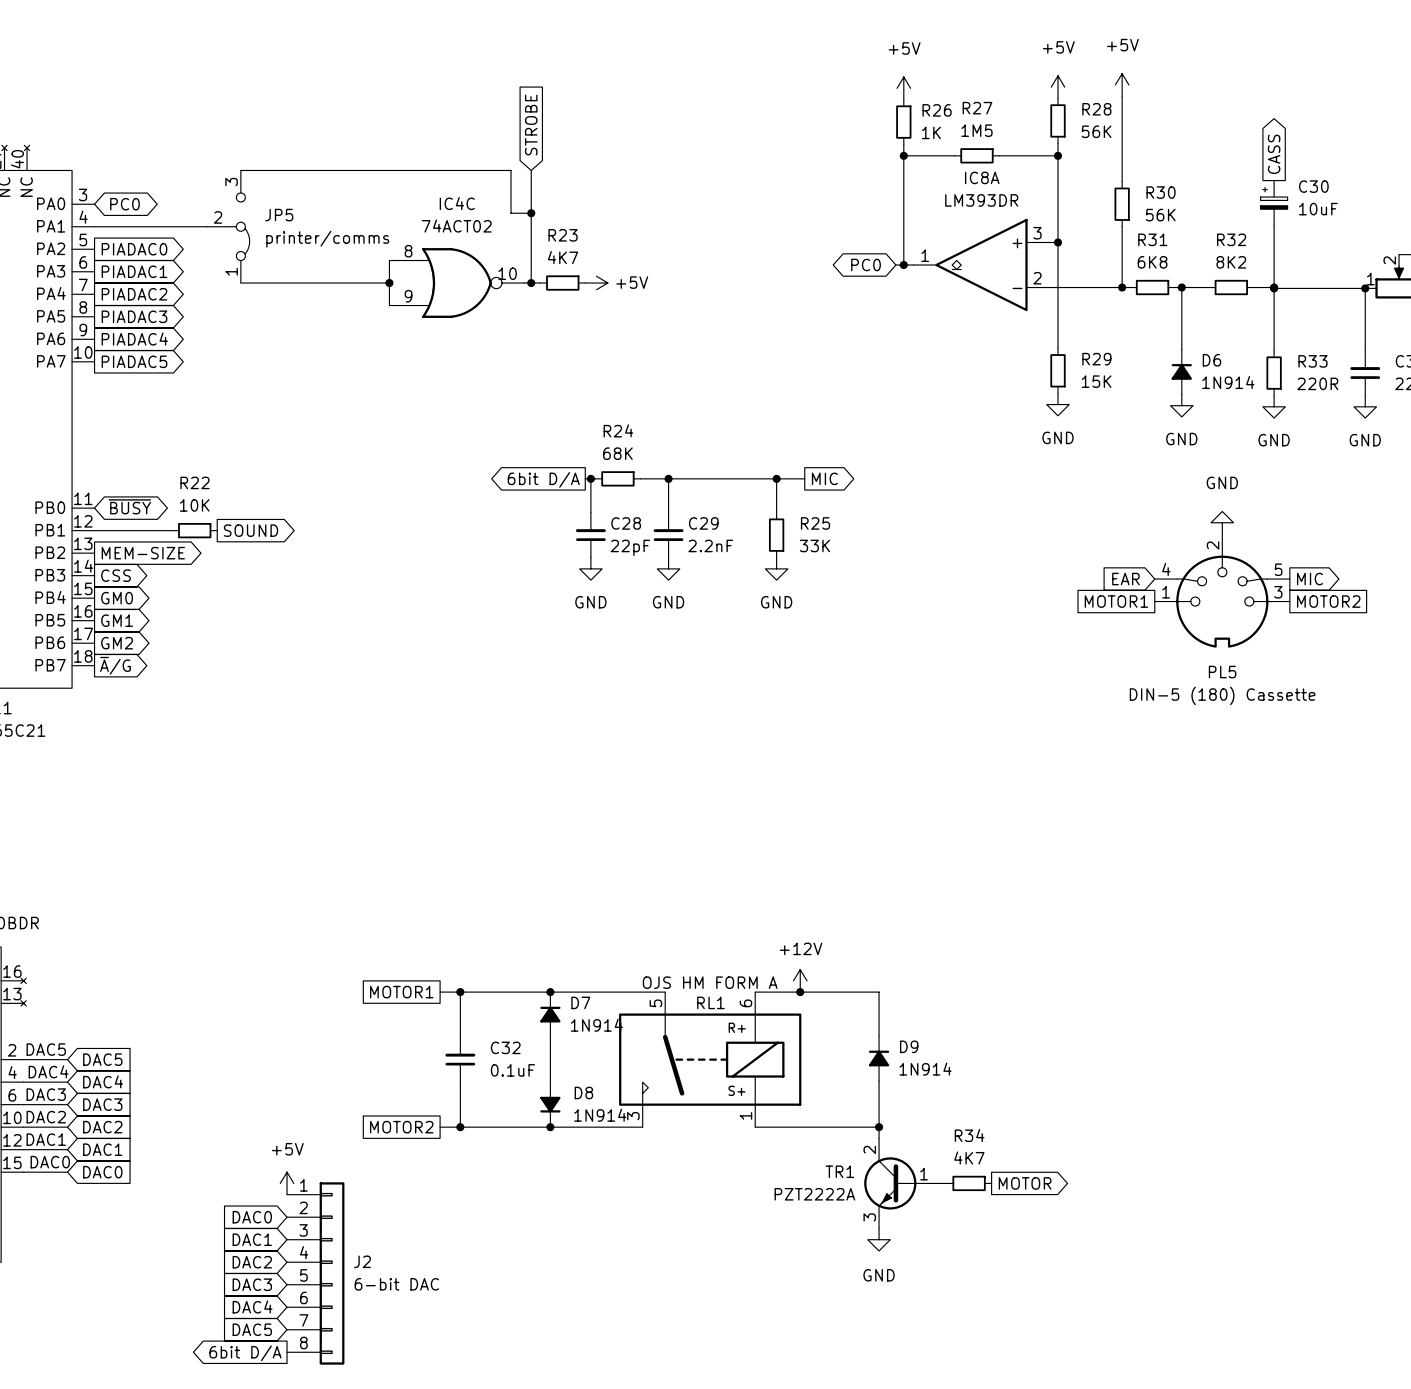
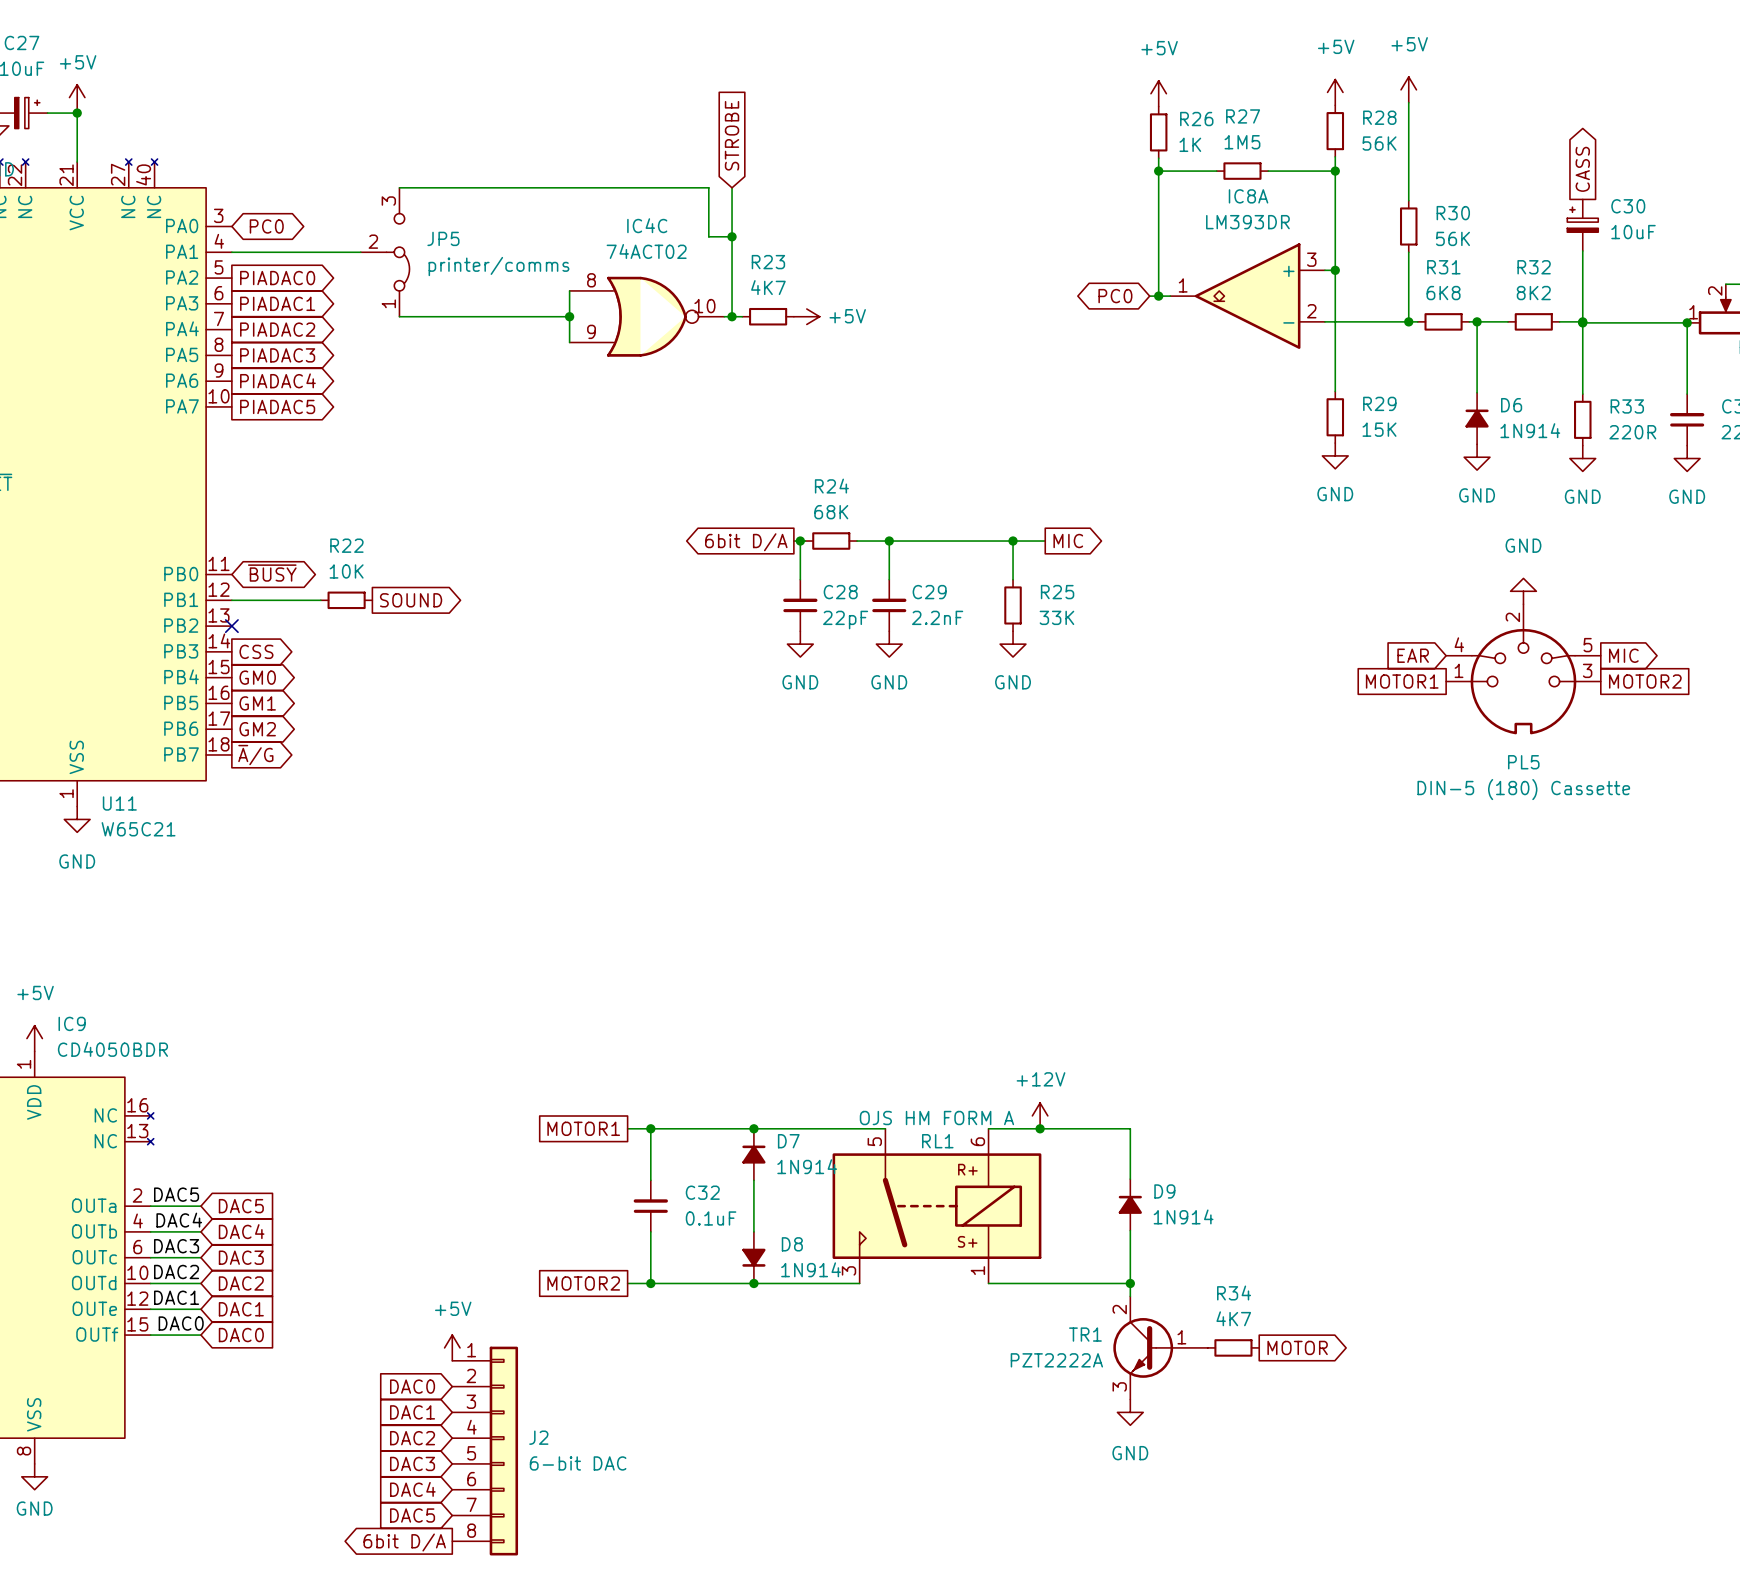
no-connect mark: none -> (231, 626)
global label: MEM-SIZE (143, 553) -> none

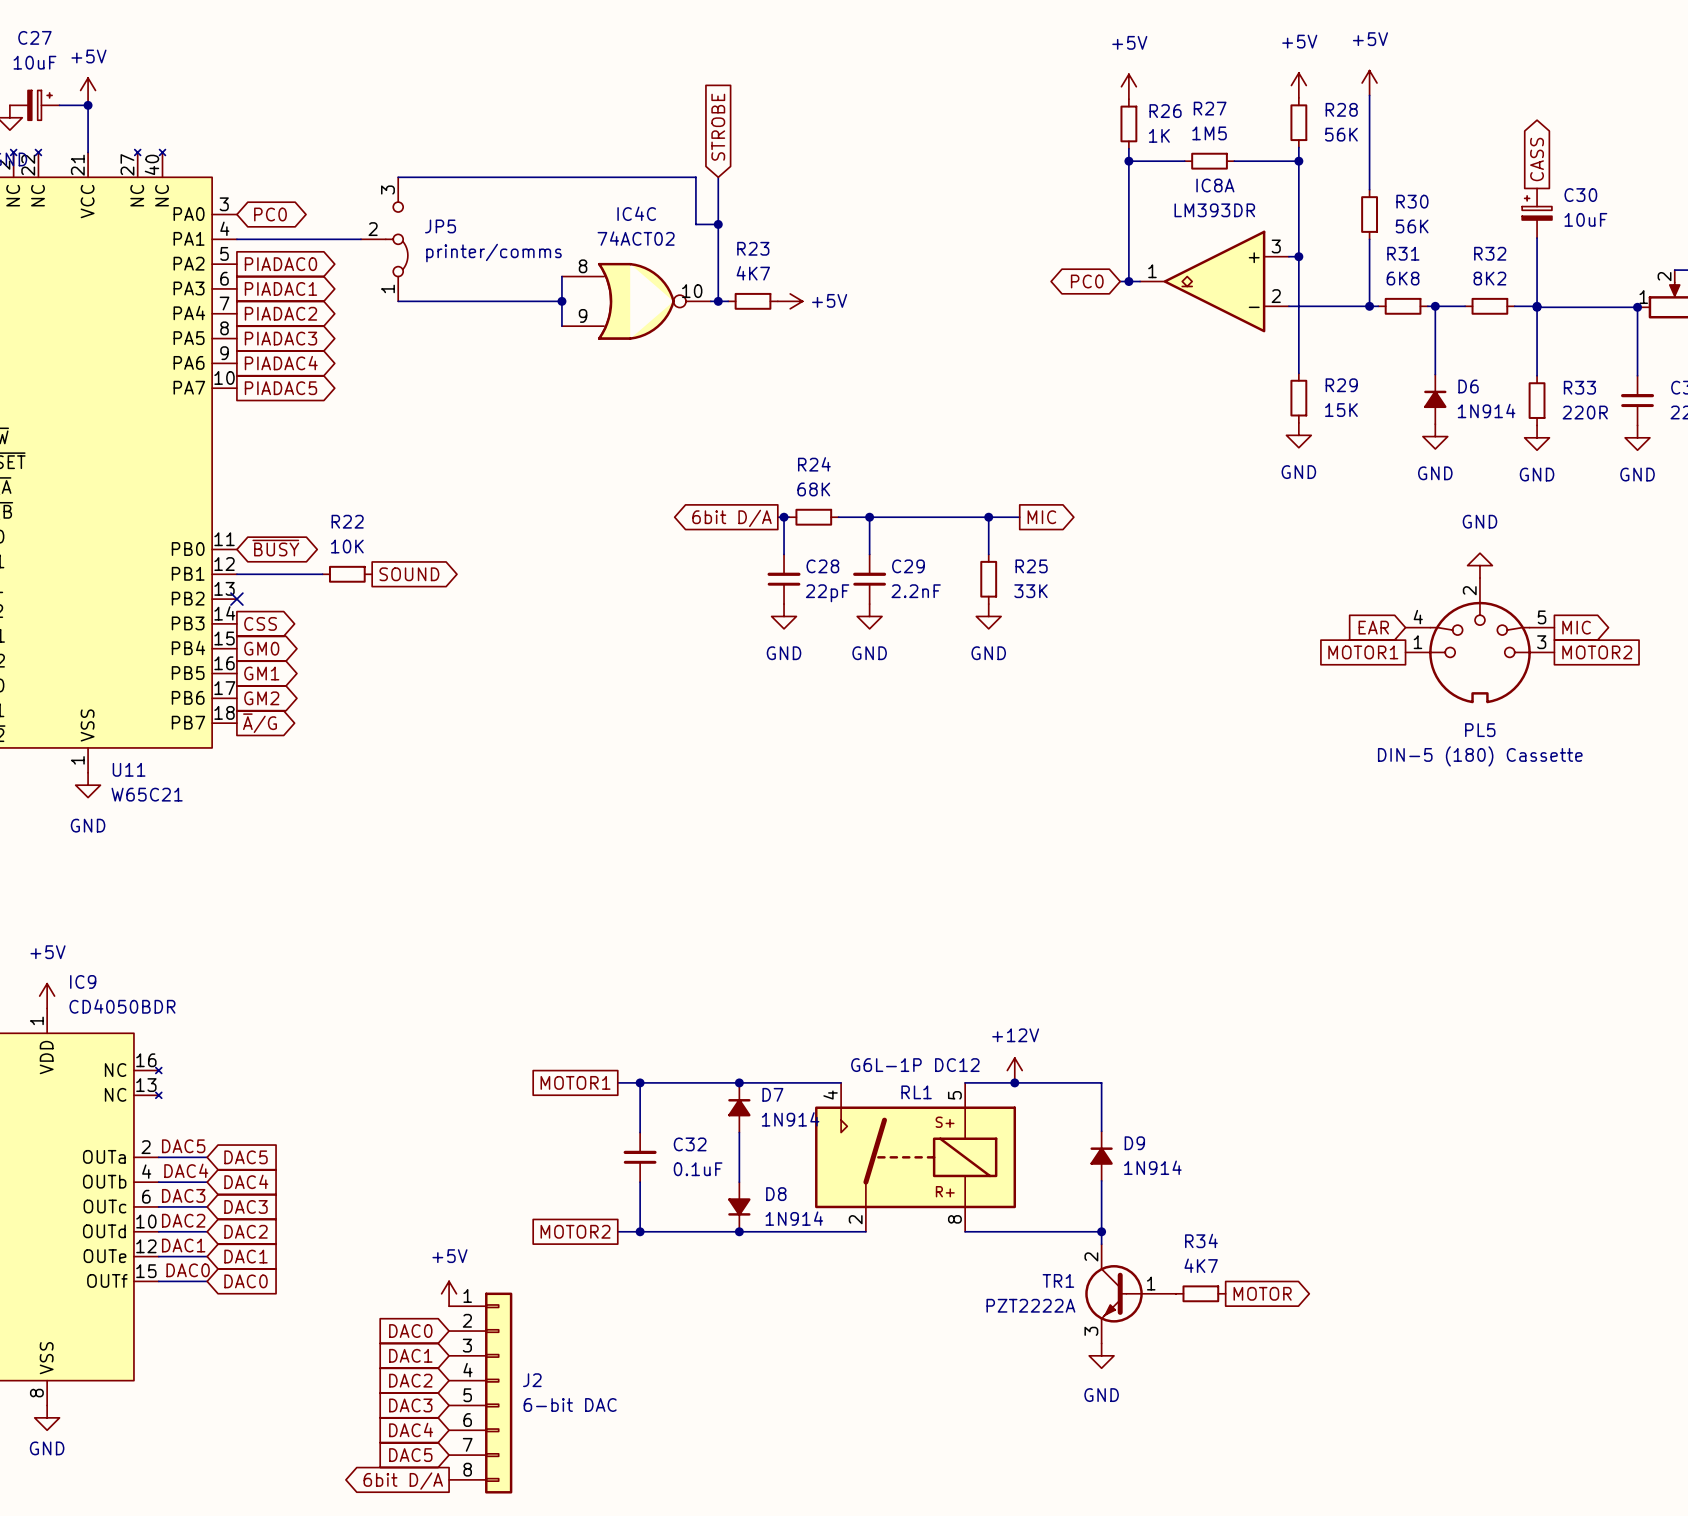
RL1 value: OJS HM FORM A (936, 1118) -> G6L-1P DC12 (915, 1065)
RL1 symbol: [832, 1128, 1042, 1284] -> [815, 1082, 1017, 1232]
wire: (859, 1128) (885, 1128) -> (841, 1231) (865, 1231)

